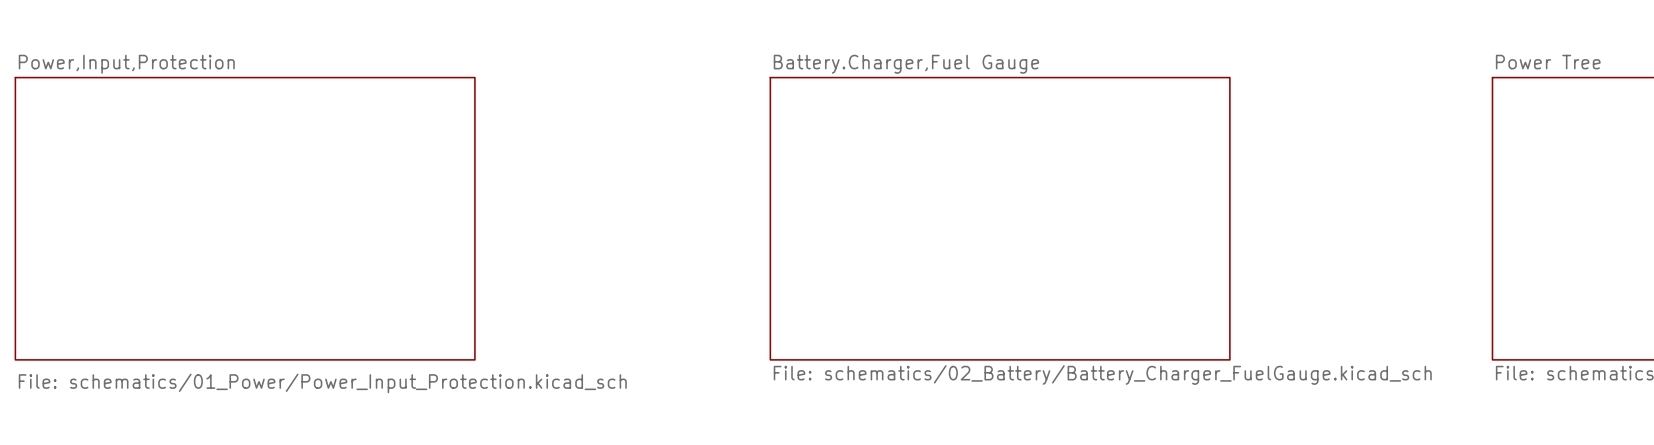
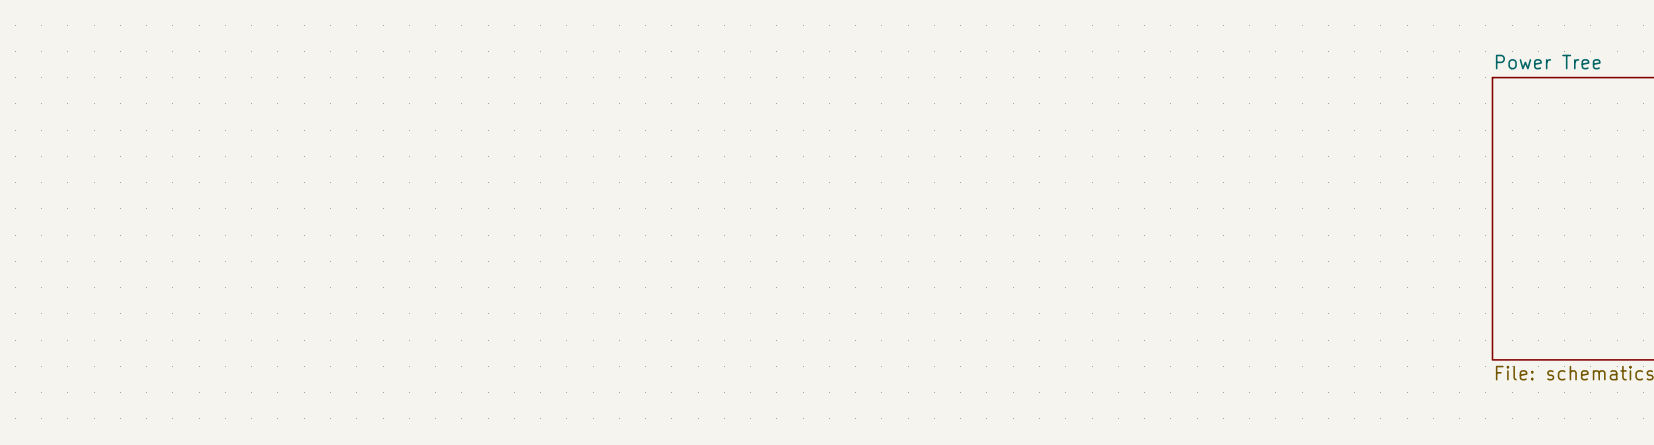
sheet Power,Input,Protection: File: schematics/01_Power/Power_Input_Protection.kicad_sch (245, 218) -> none
sheet Battery.Charger,Fuel Gauge: File: schematics/02_Battery/Battery_Charger_FuelGauge.kicad_sch (1000, 218) -> none

